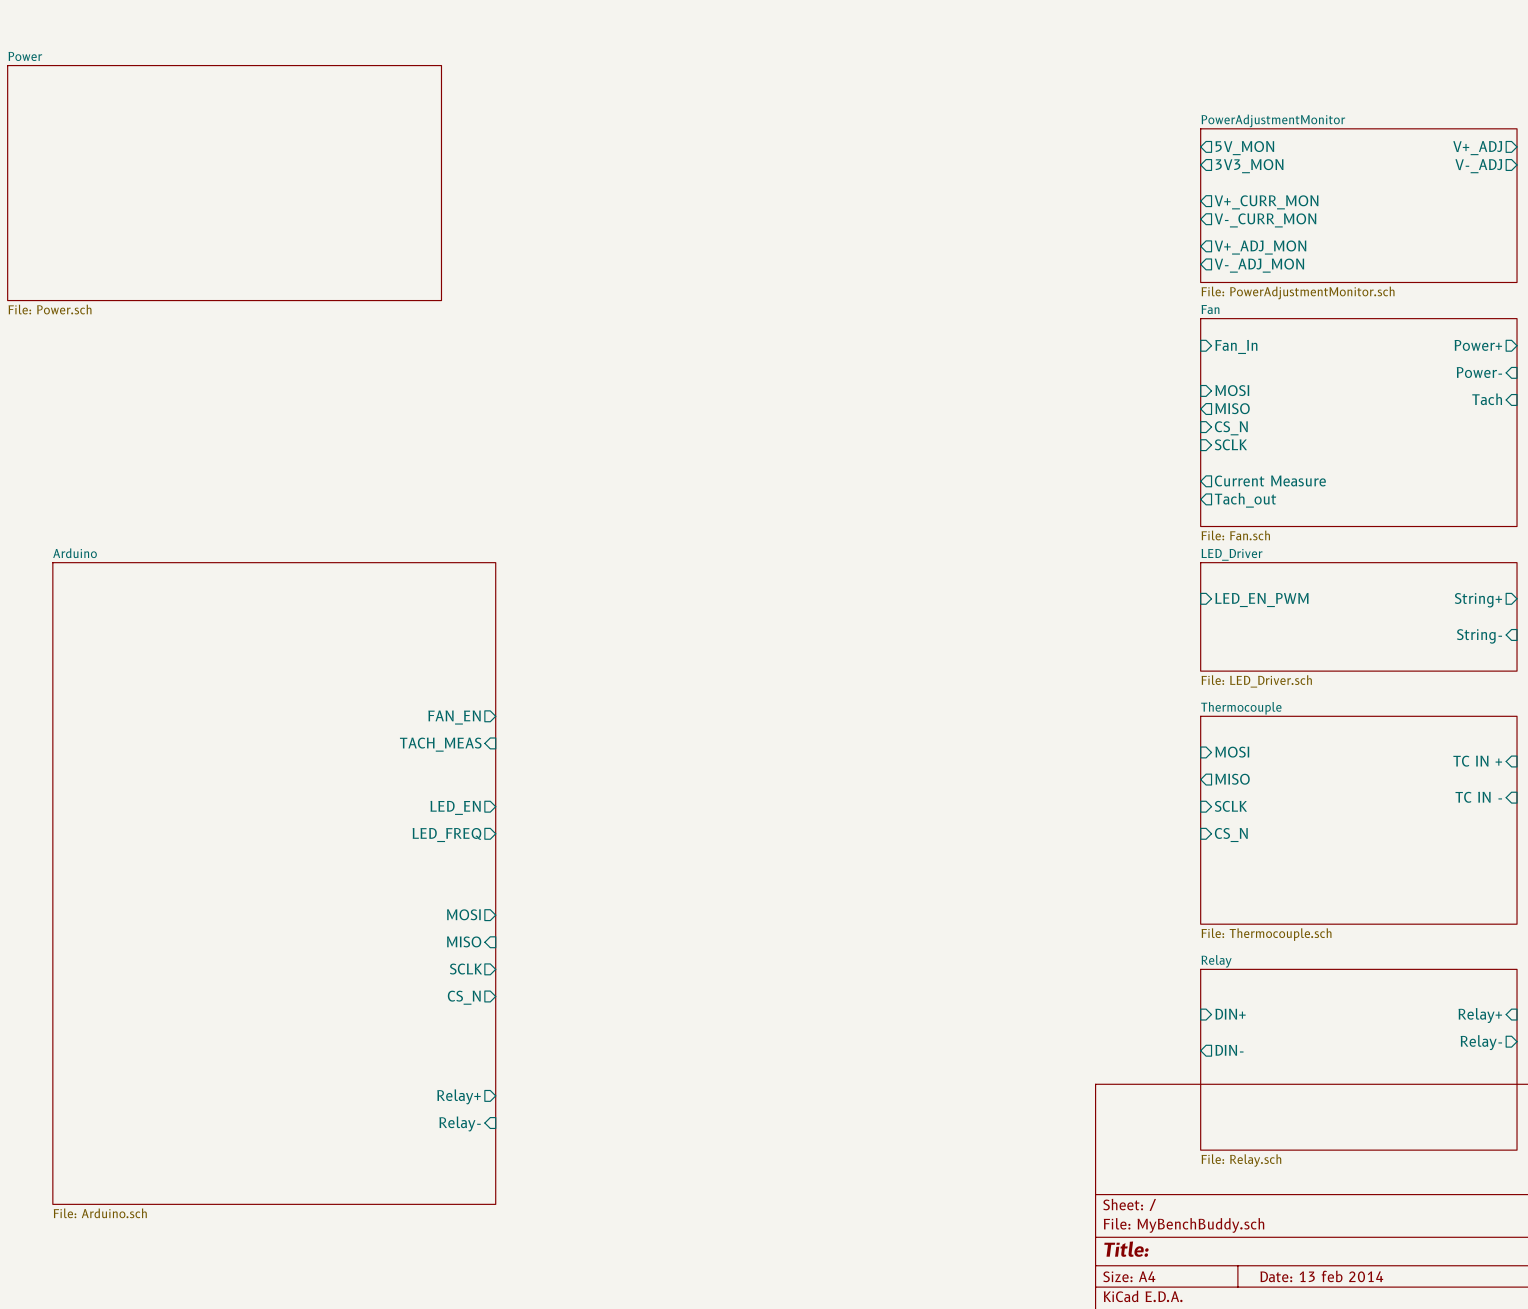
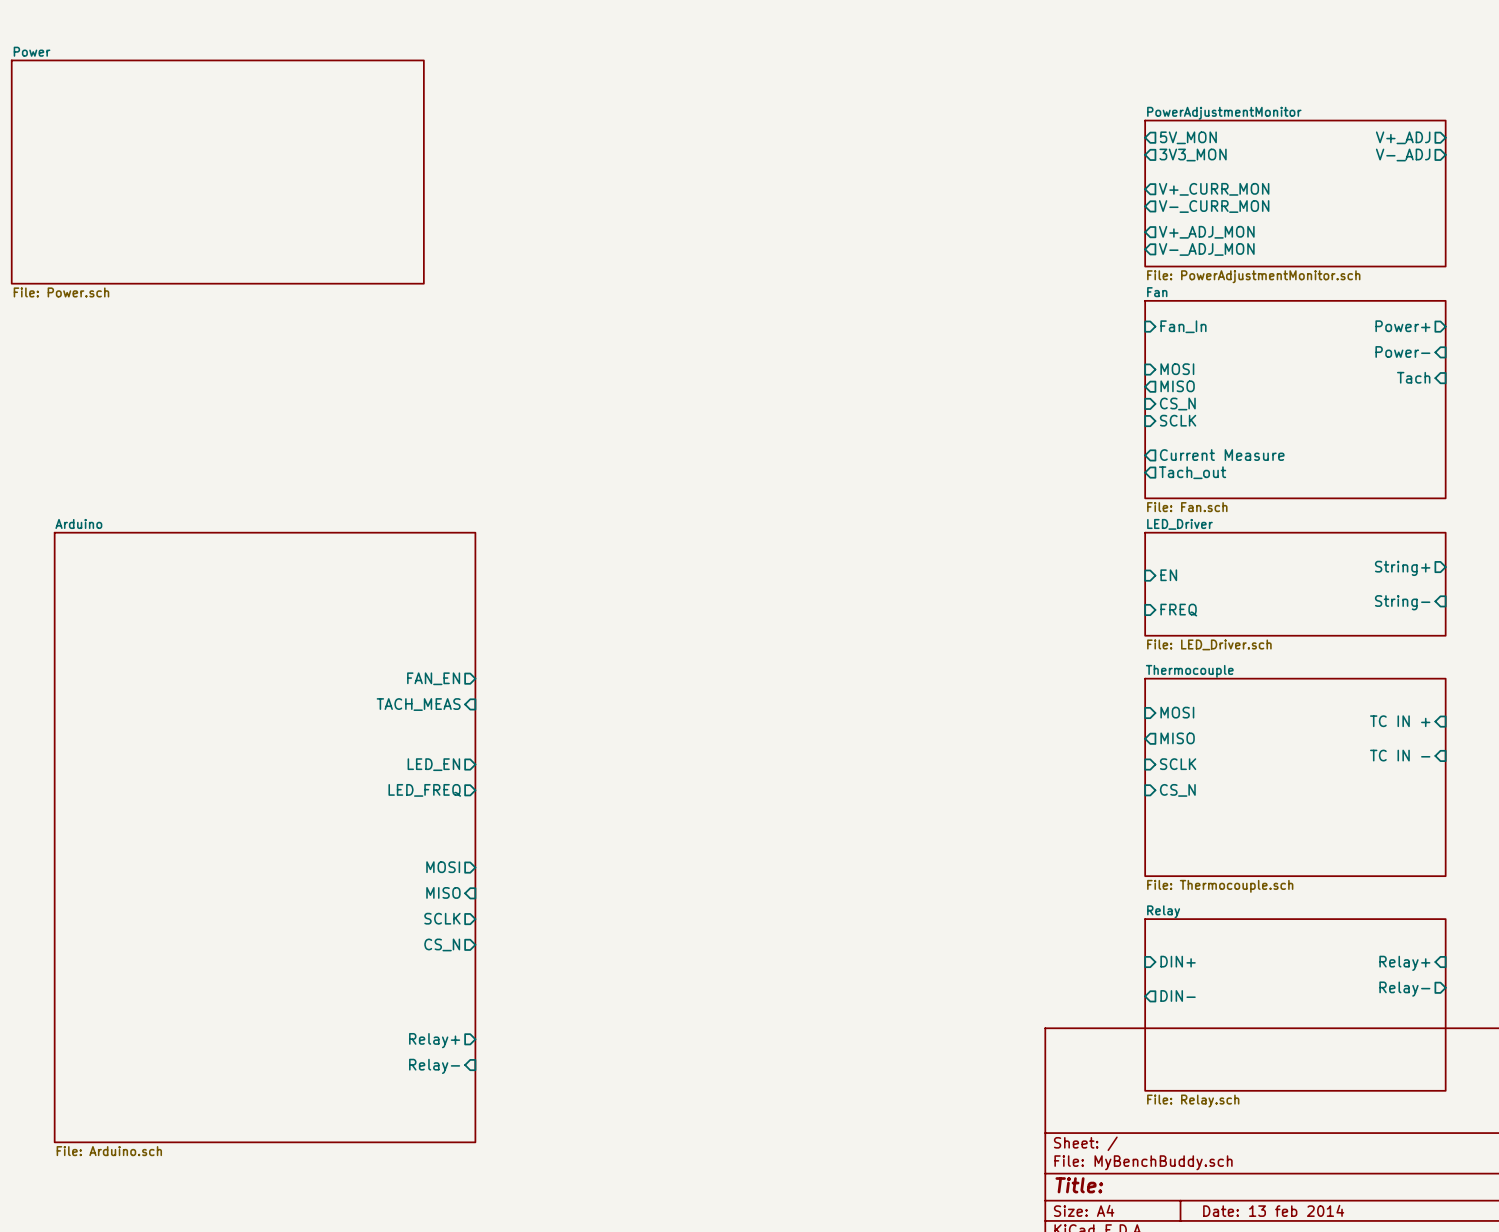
sheet pin: LED_EN_PWM (1261, 600) -> none
sheet pin: none -> EN (1168, 575)
sheet pin: none -> FREQ (1178, 610)

